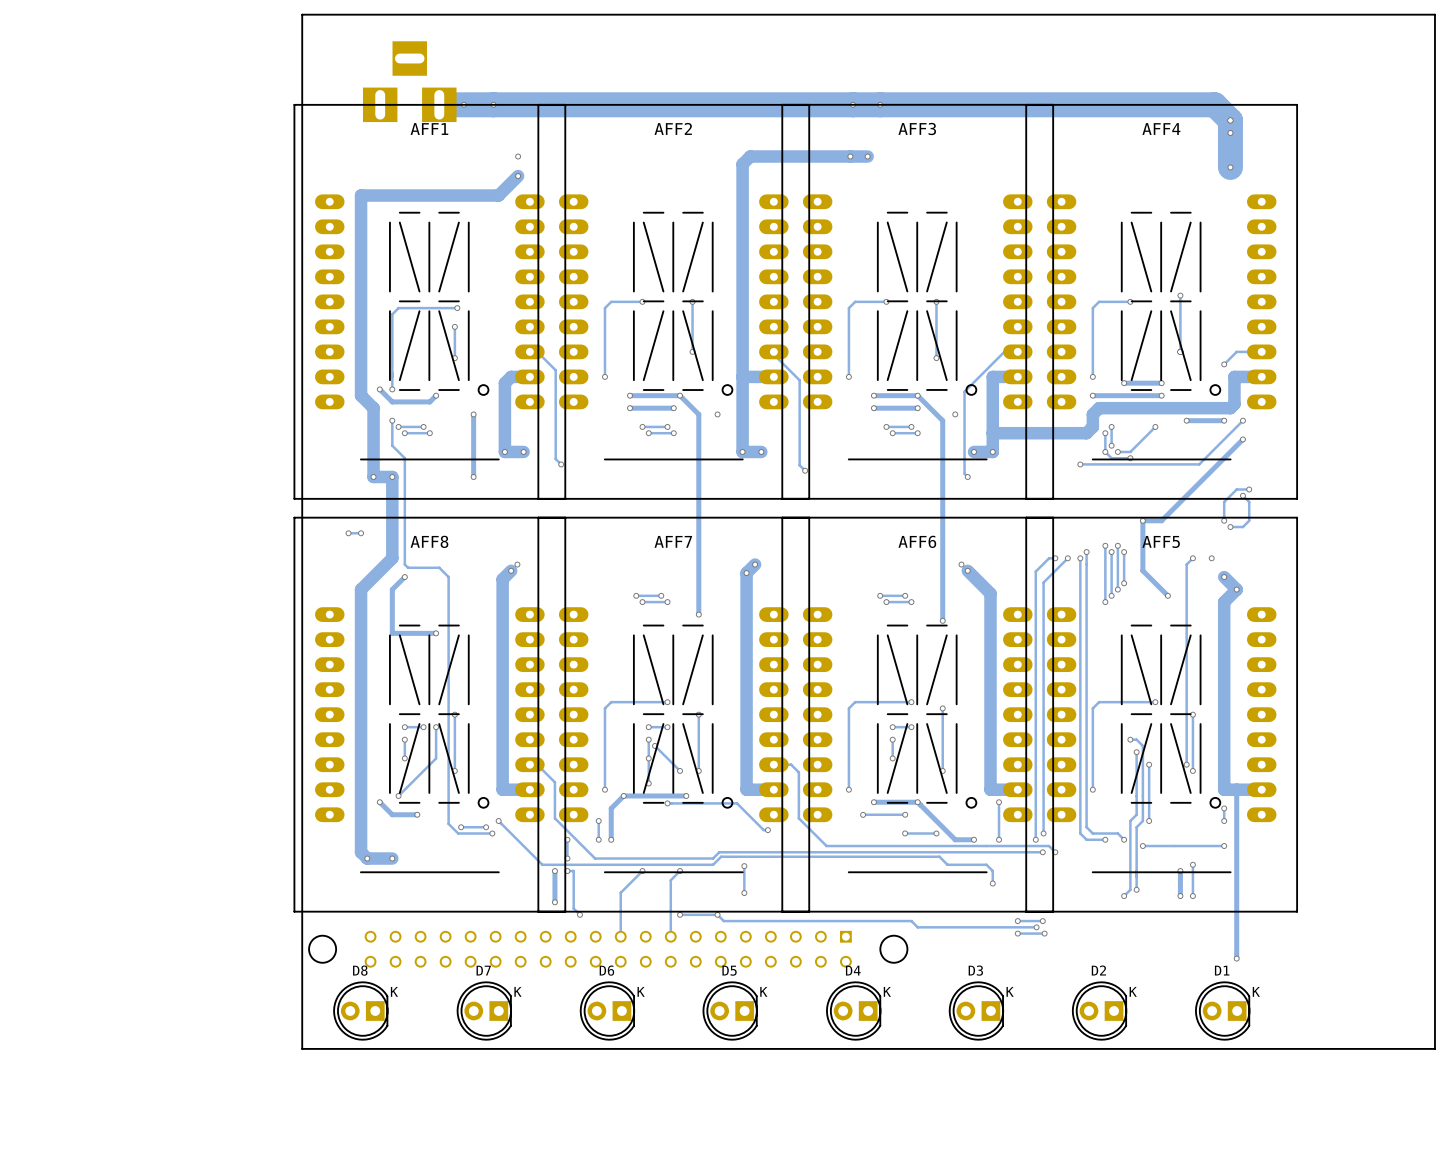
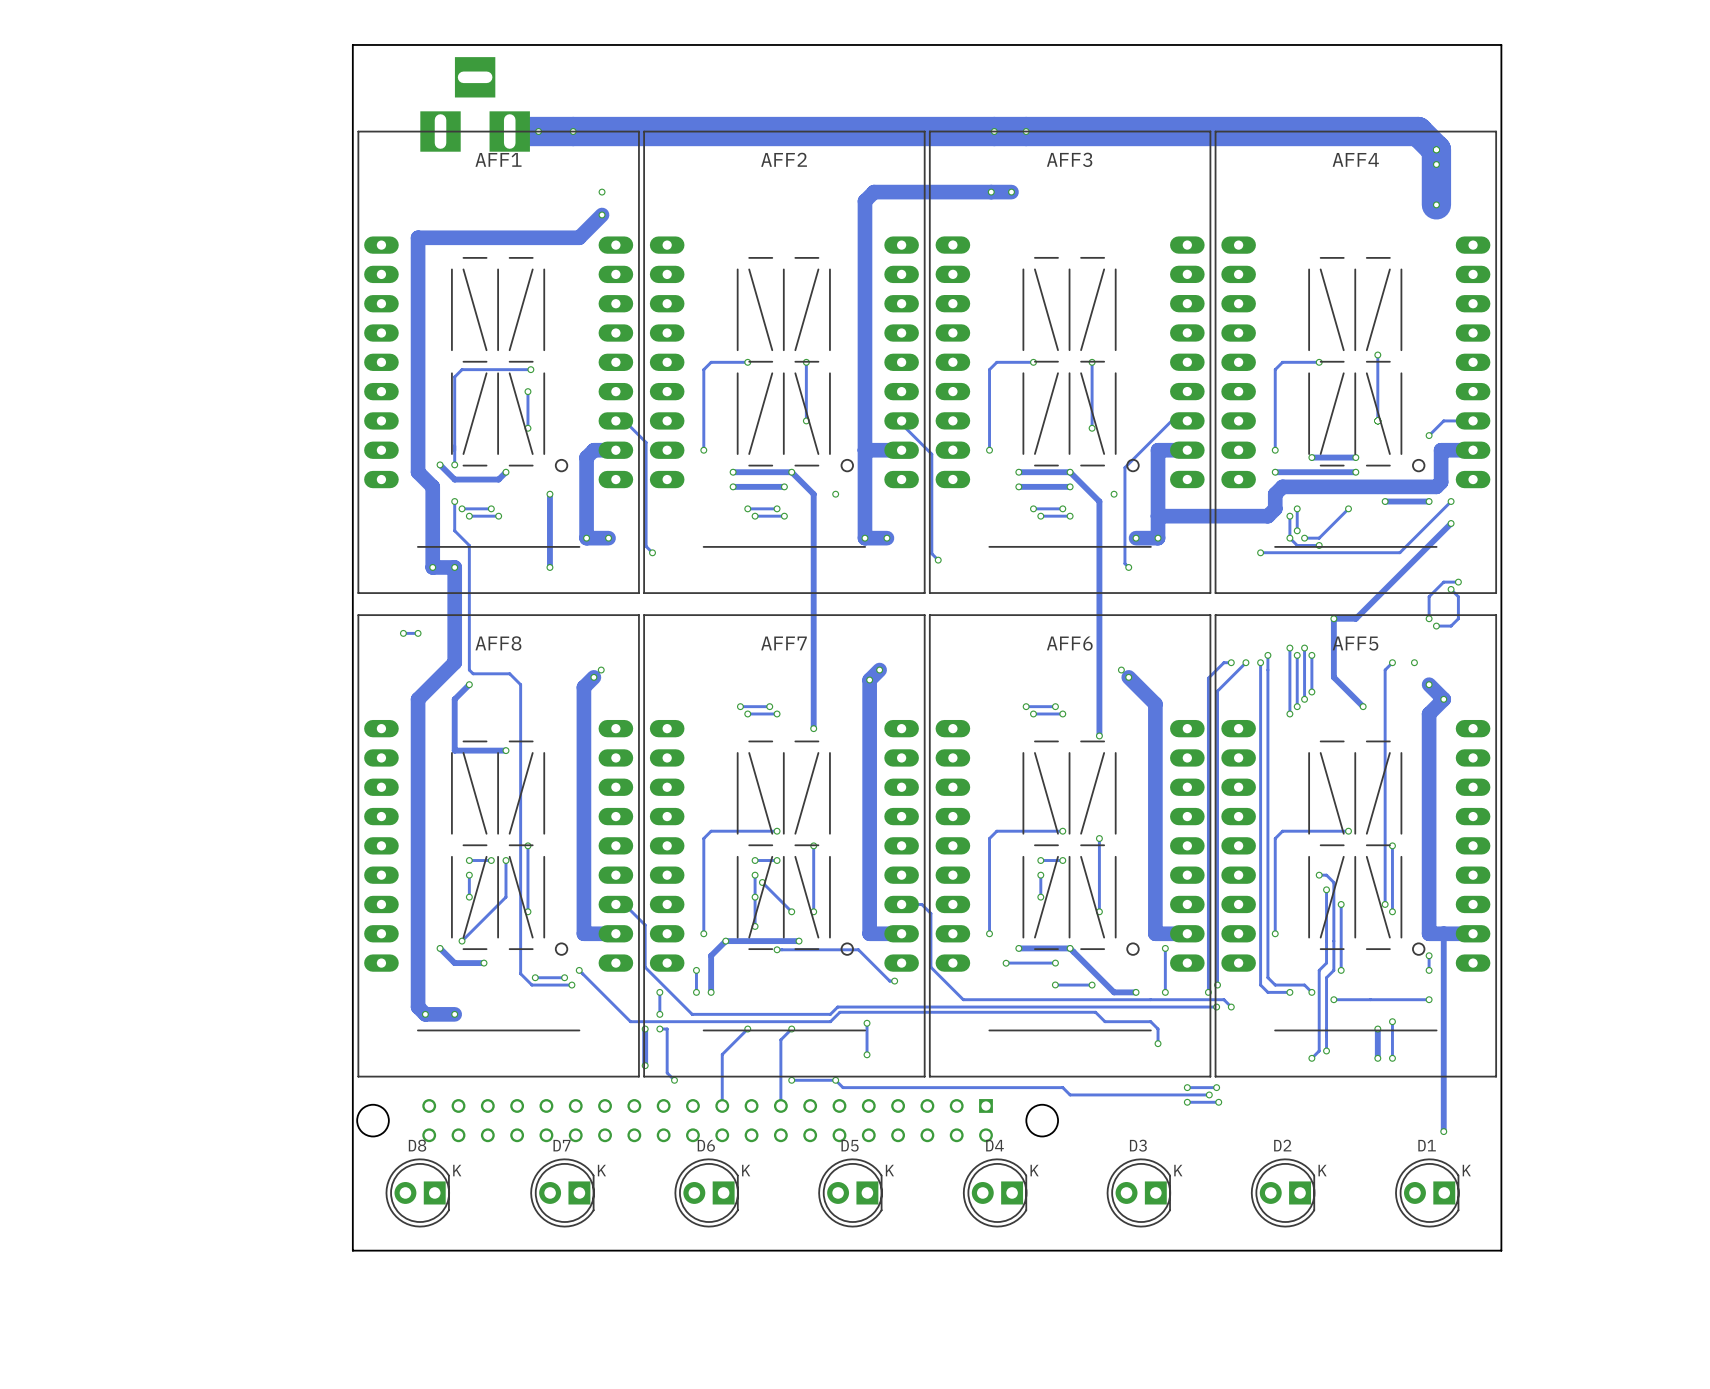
board edge: (1434, 14) (1434, 1048) (302, 1048) (302, 14) (1434, 14) -> (1501, 44) (1501, 1250) (352, 1250) (352, 44) (1501, 44)
AFF1 footprint: [293, 104, 567, 500] -> [357, 130, 640, 594]
AFF2 footprint: [537, 104, 810, 500] -> [643, 130, 926, 594]
AFF3 footprint: [781, 104, 1054, 500] -> [928, 130, 1212, 594]
AFF4 footprint: [1025, 104, 1298, 500] -> [1214, 130, 1498, 594]
AFF8 footprint: [293, 516, 567, 913] -> [357, 614, 640, 1078]
AFF7 footprint: [537, 516, 810, 913] -> [643, 614, 926, 1078]
AFF6 footprint: [781, 516, 1054, 913] -> [928, 614, 1212, 1078]
AFF5 footprint: [1025, 516, 1298, 913] -> [1214, 614, 1498, 1078]

